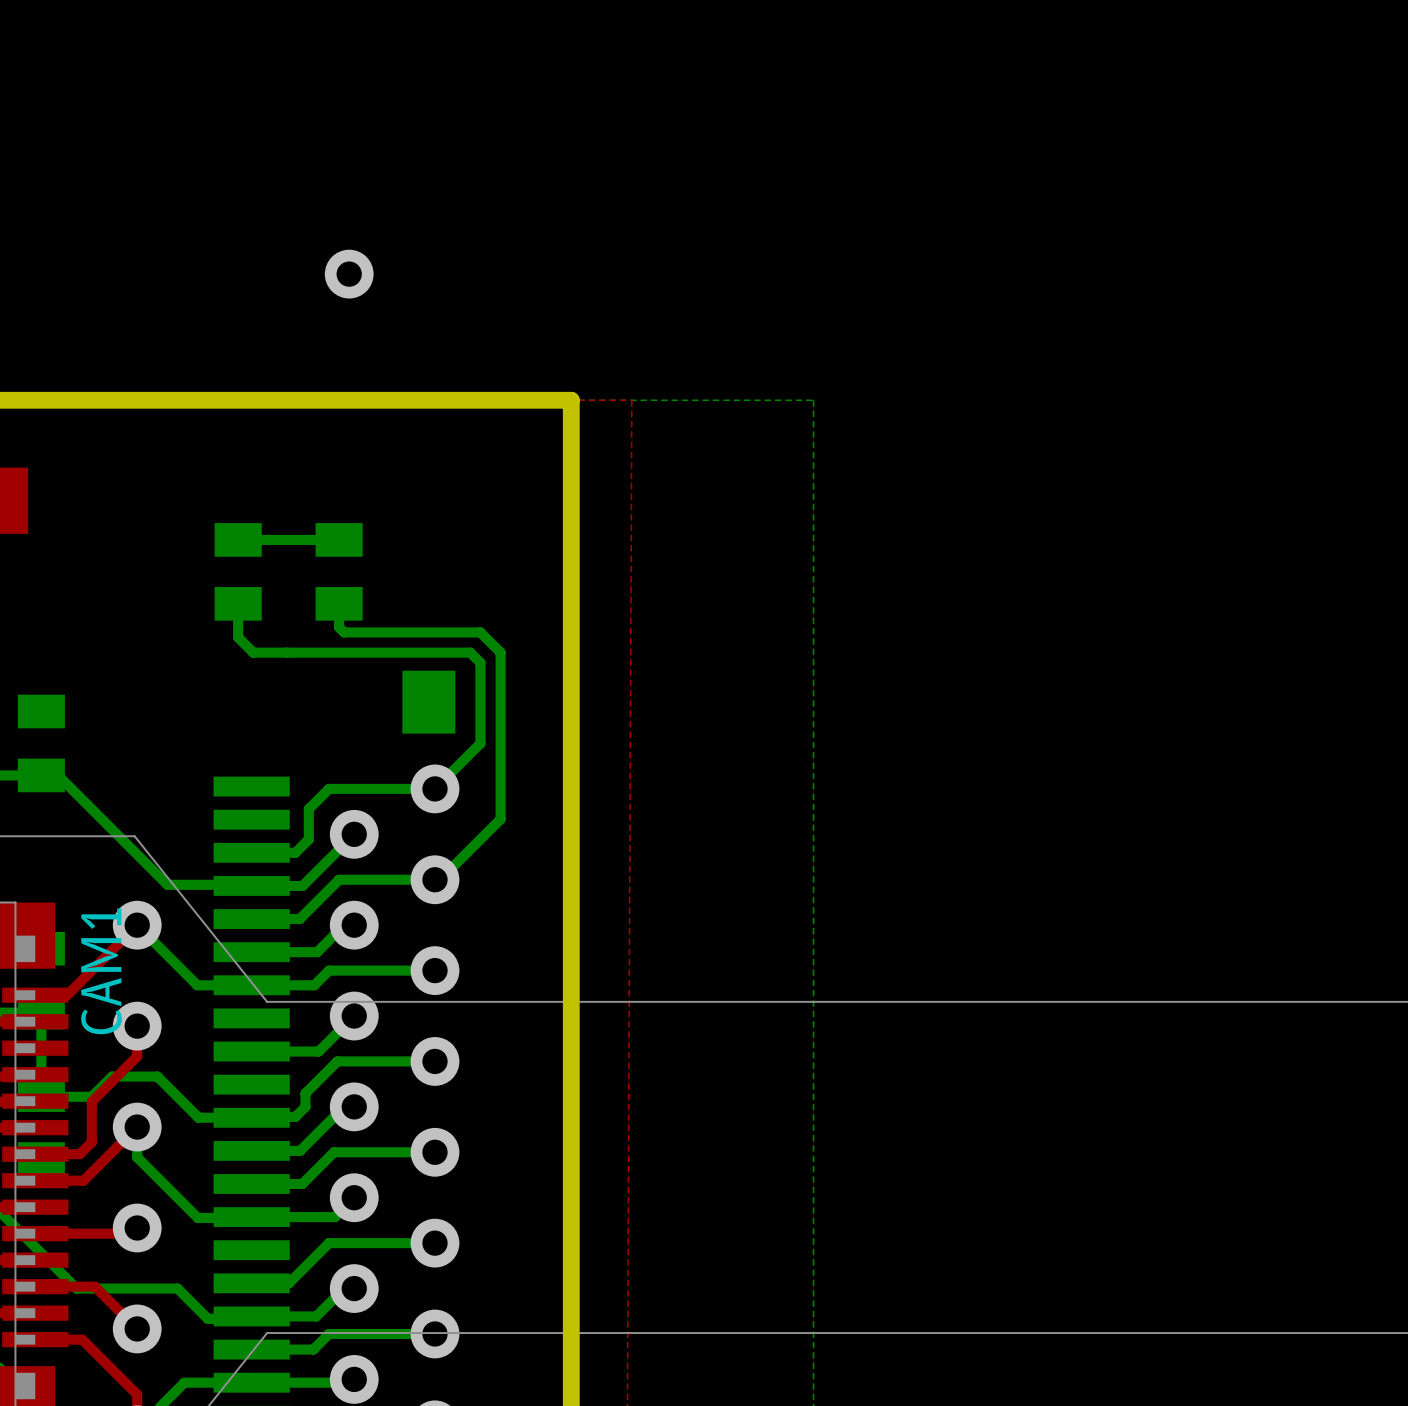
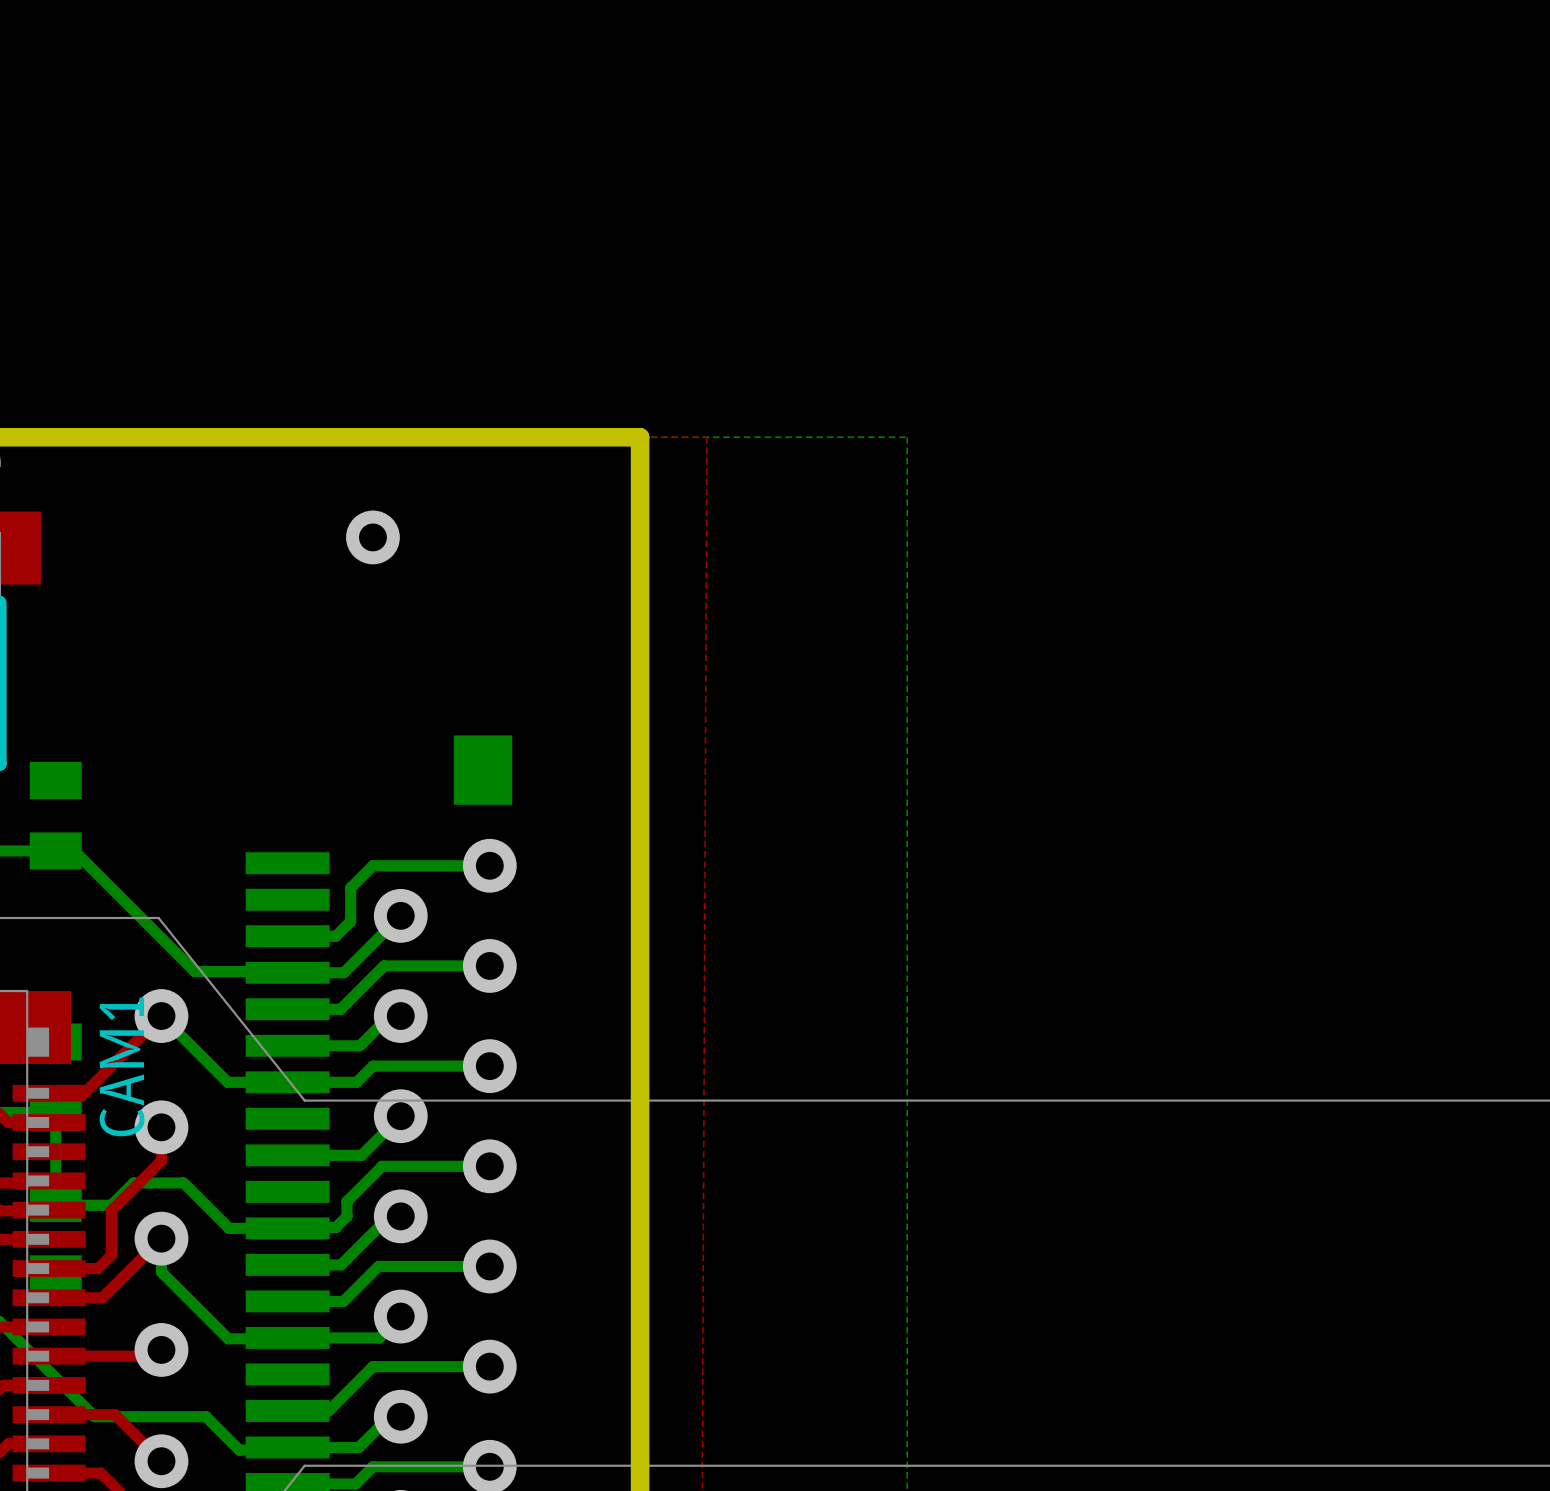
via position: (349, 274) -> (372, 537)
bottom track: (238, 539) (339, 539) -> none
part: (238, 571) -> none
part: (339, 571) -> none
bottom track: (238, 603) (238, 637) (253, 652) (470, 652) (480, 662) (480, 743) (435, 788) -> none
bottom track: (339, 603) (339, 627) (344, 632) (480, 632) (500, 652) (500, 819) (440, 879) (435, 879) -> none

